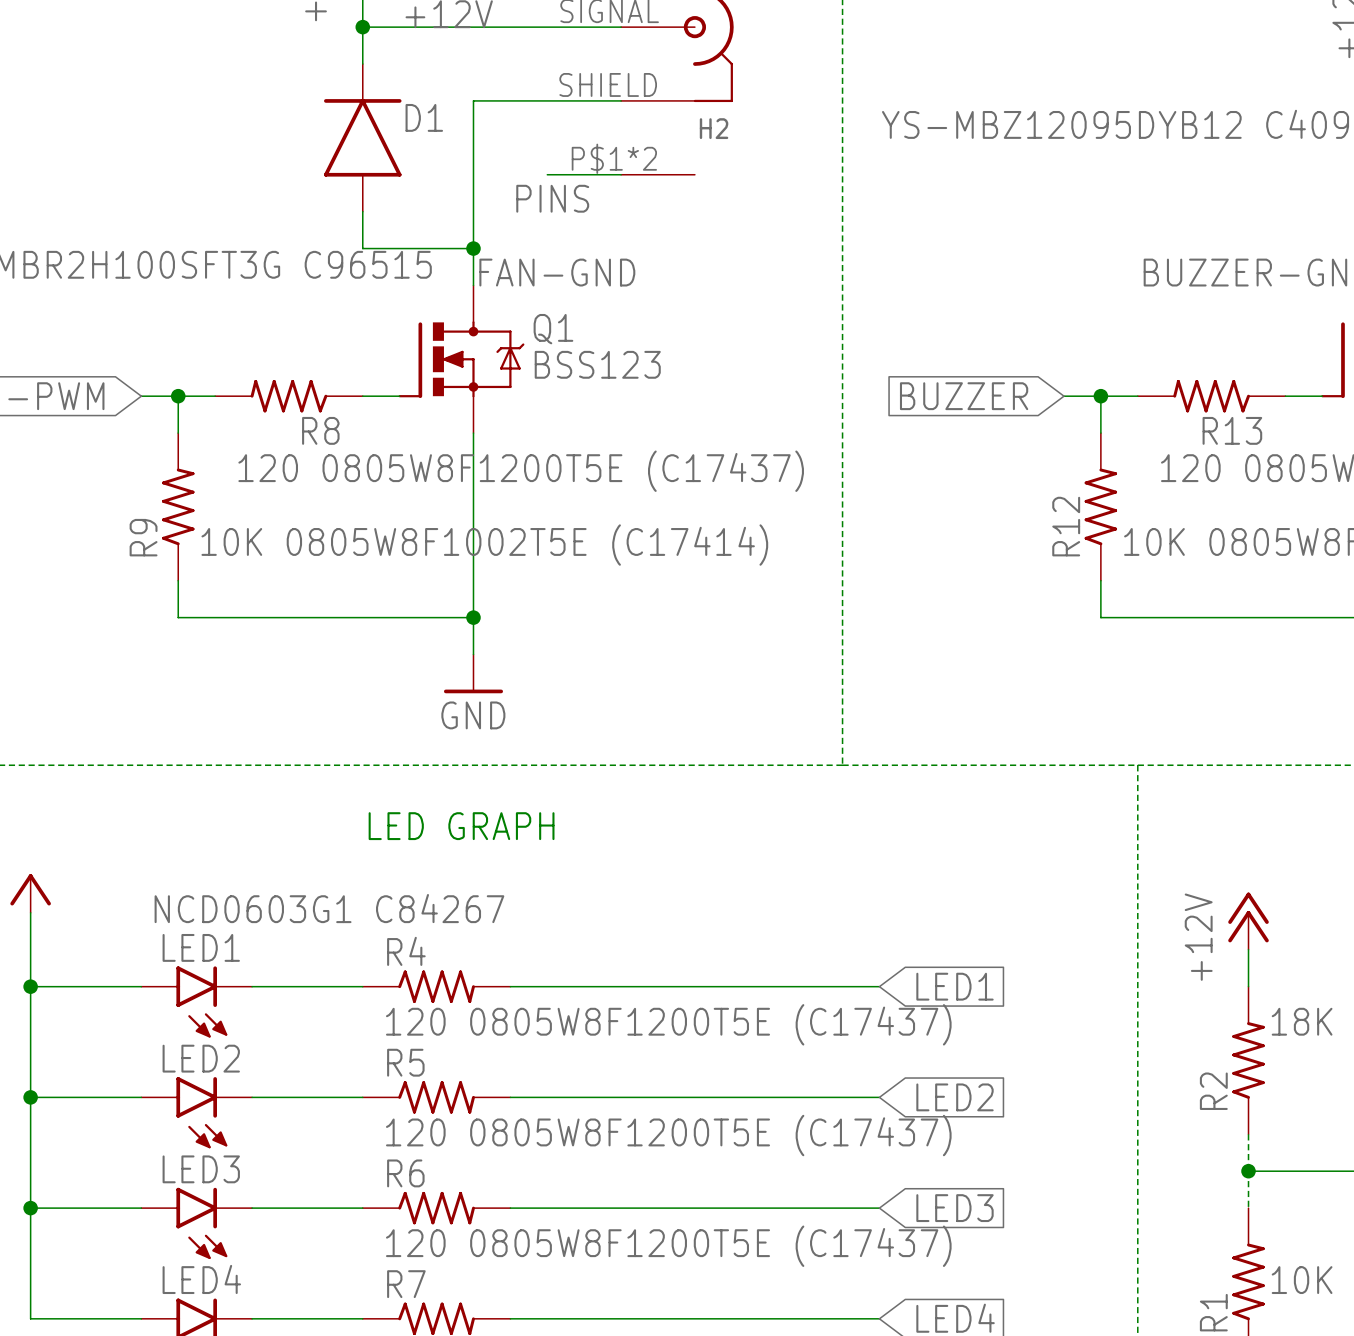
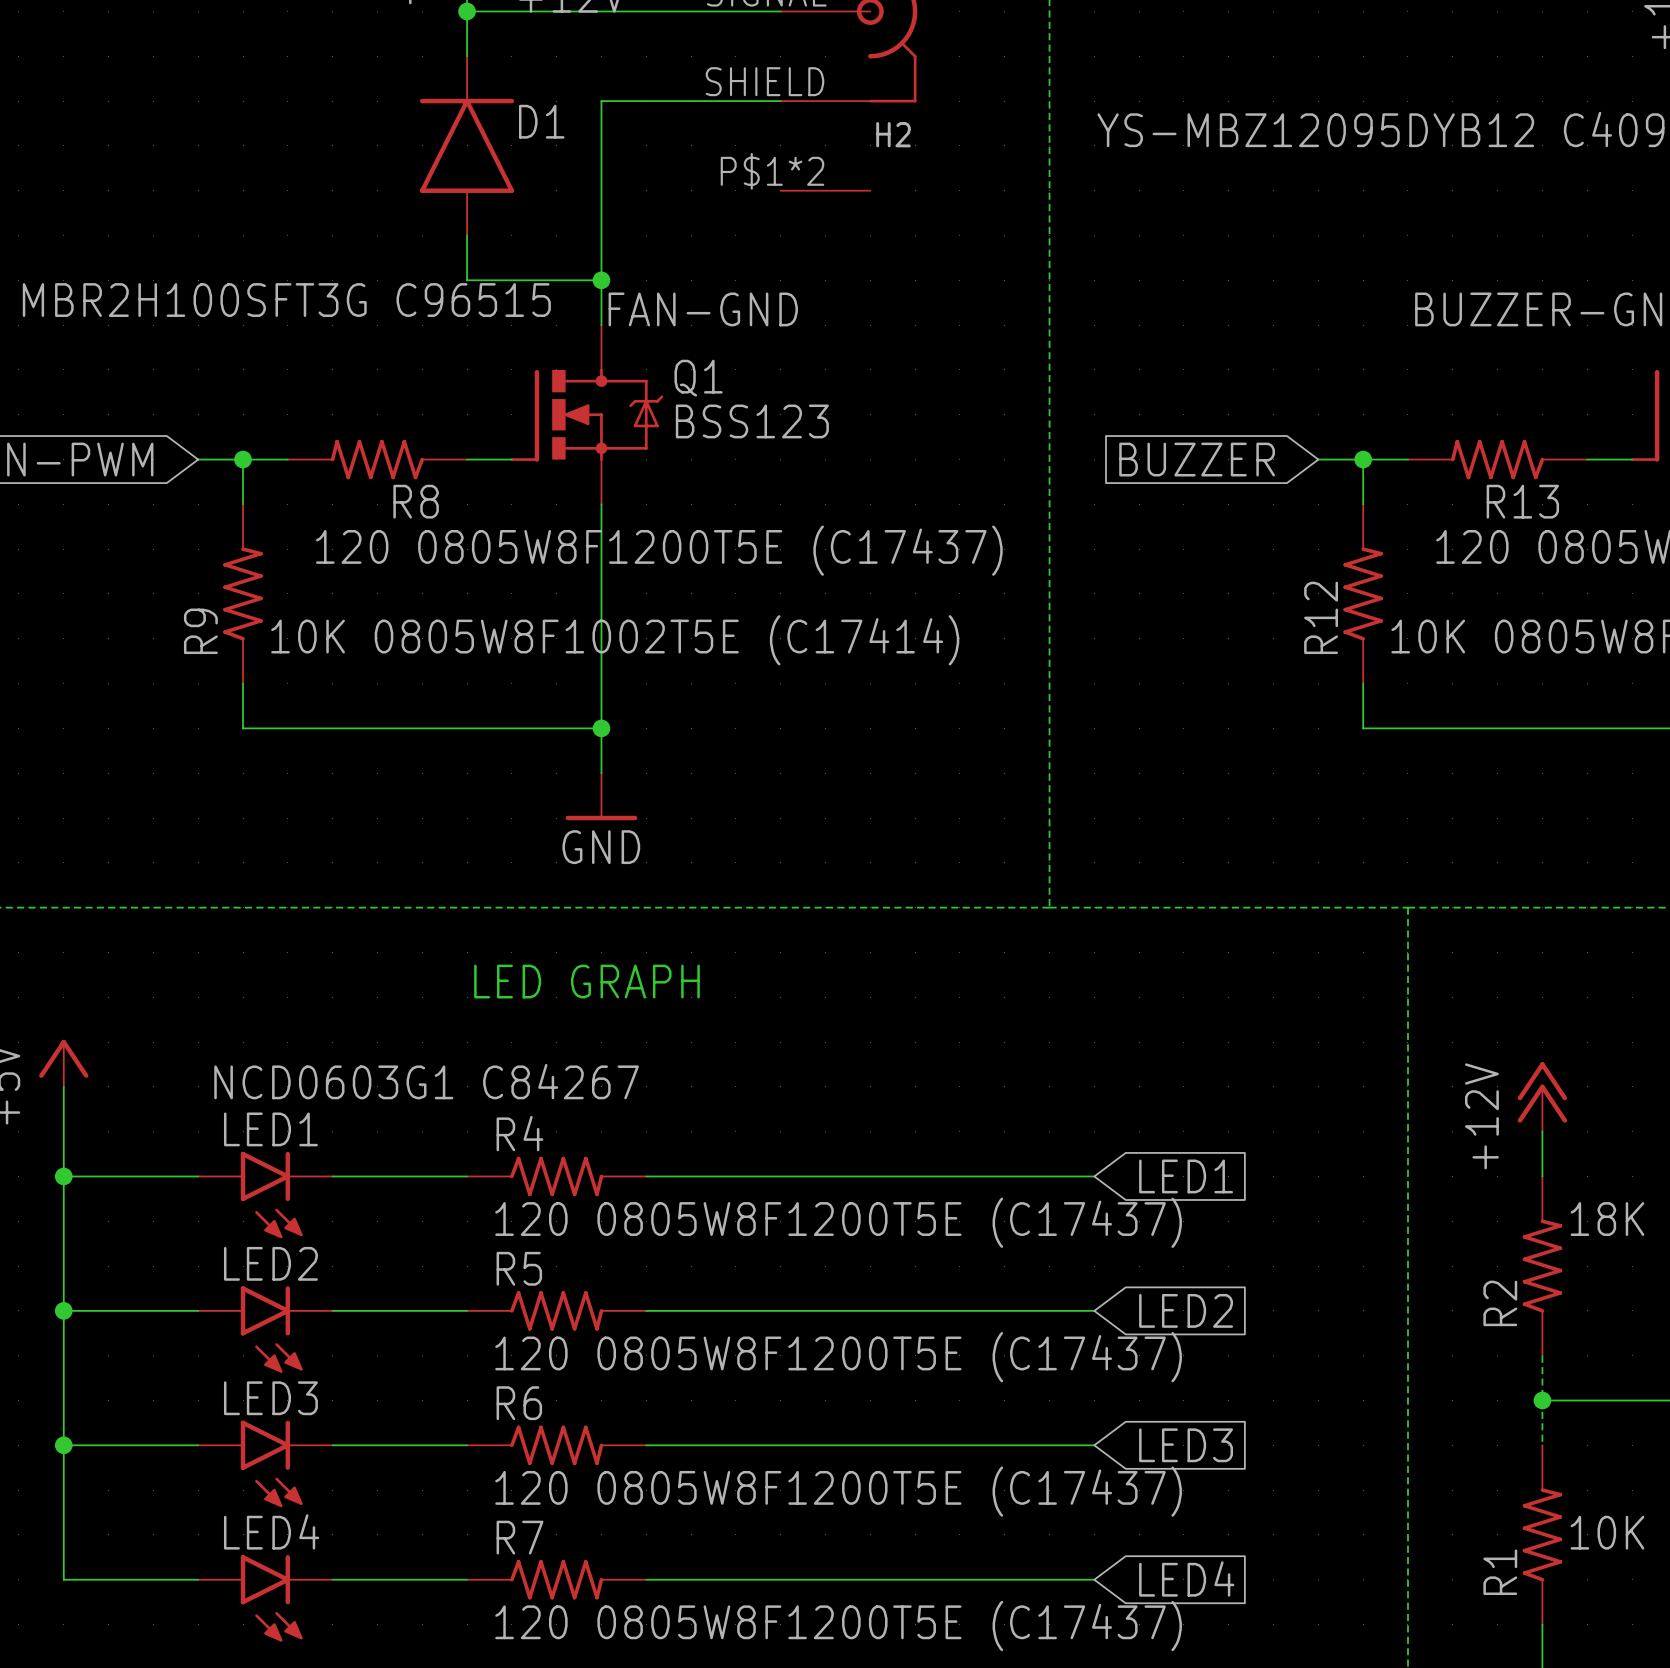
wire: (547, 174) (621, 174) -> none
label: PINS (552, 198) -> none

